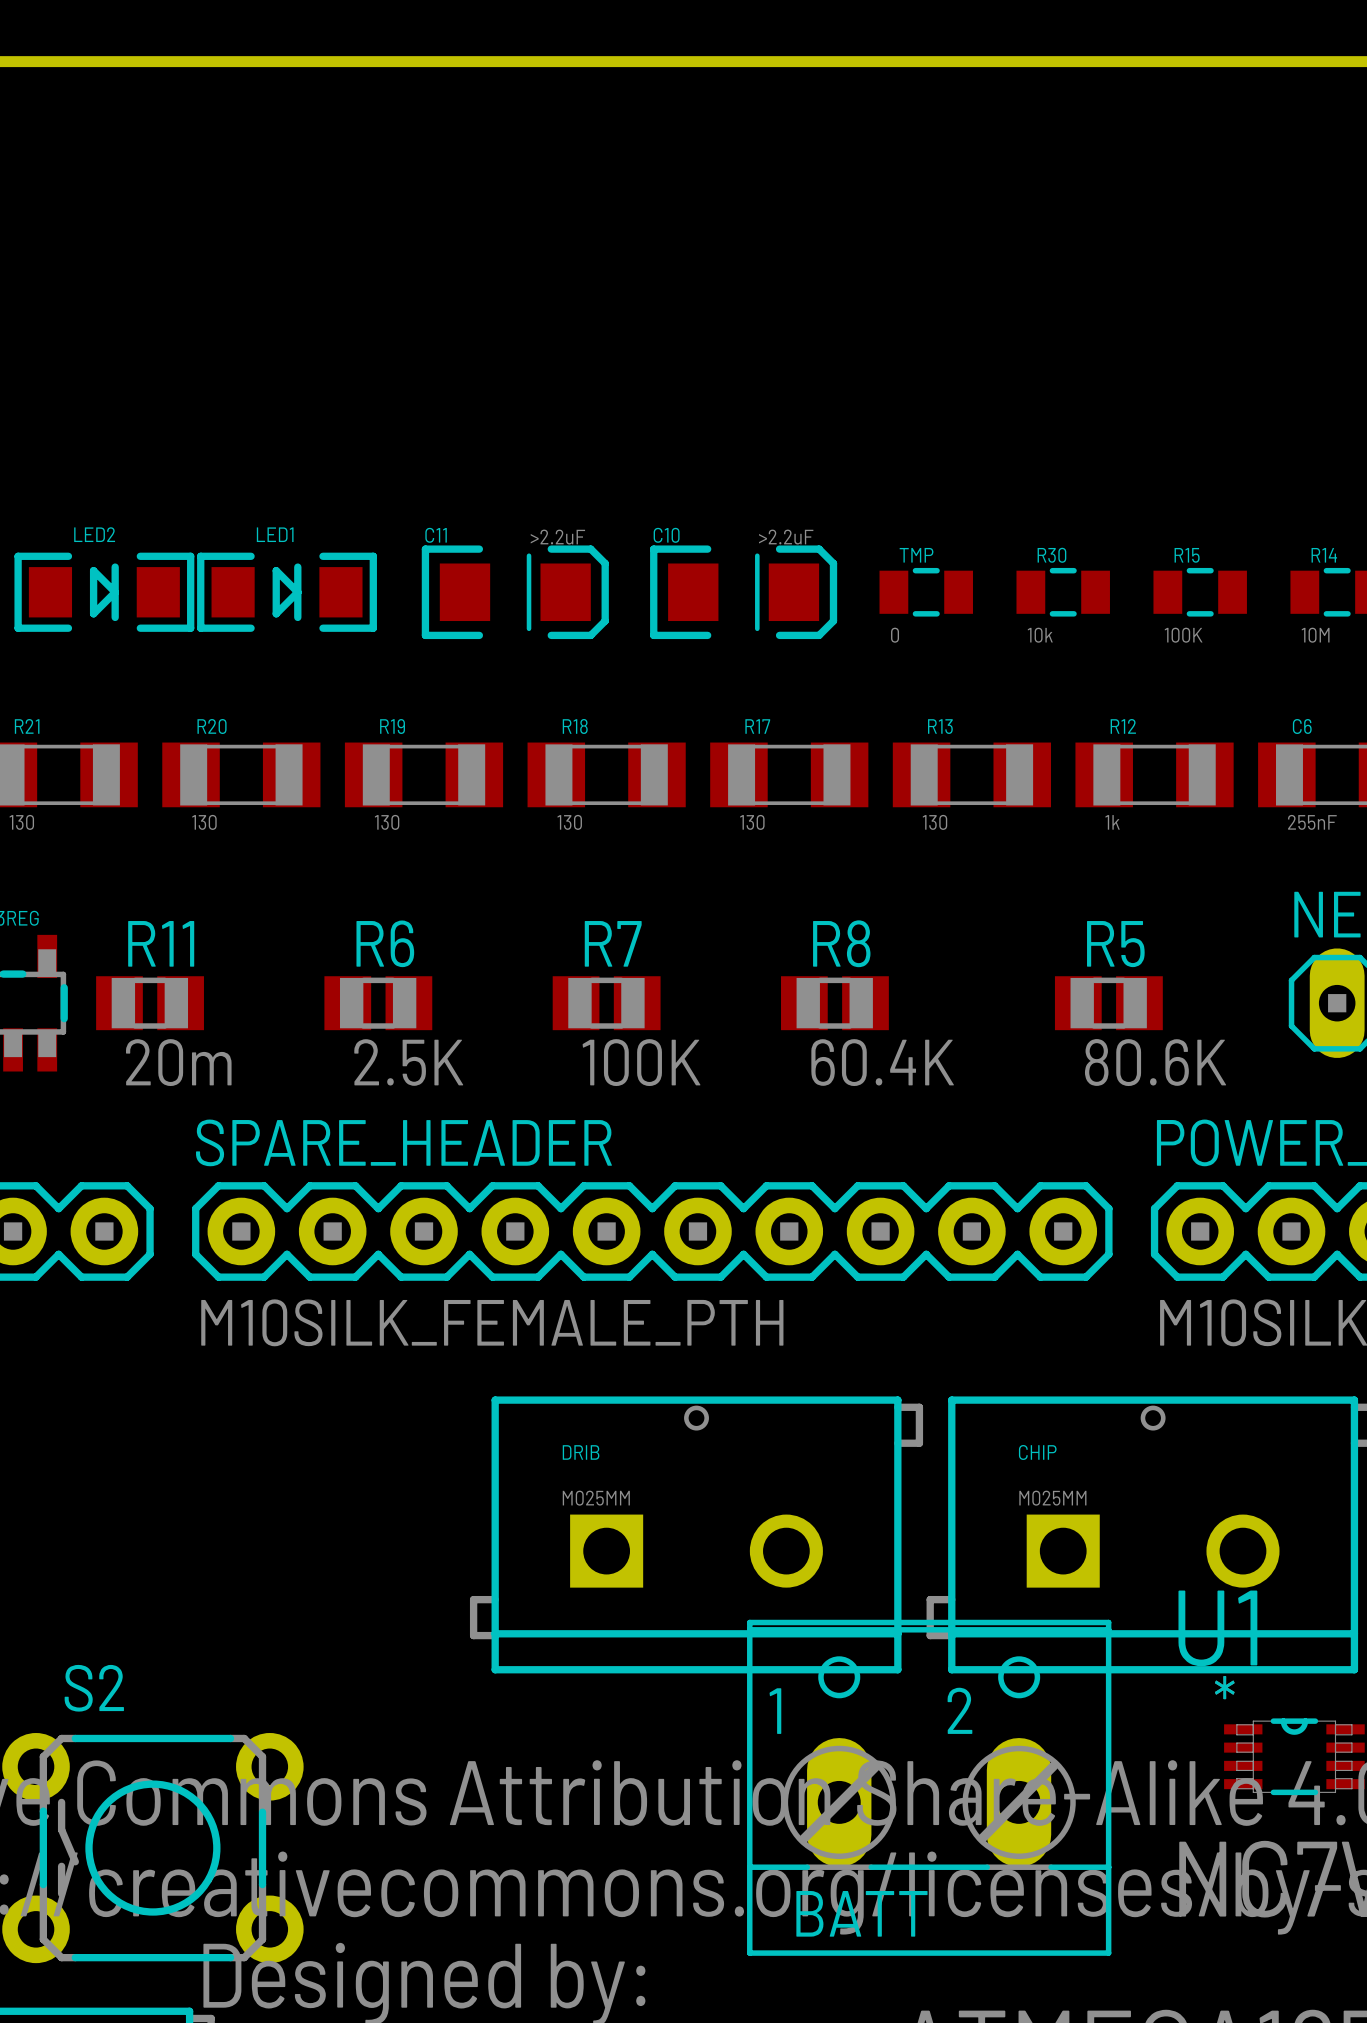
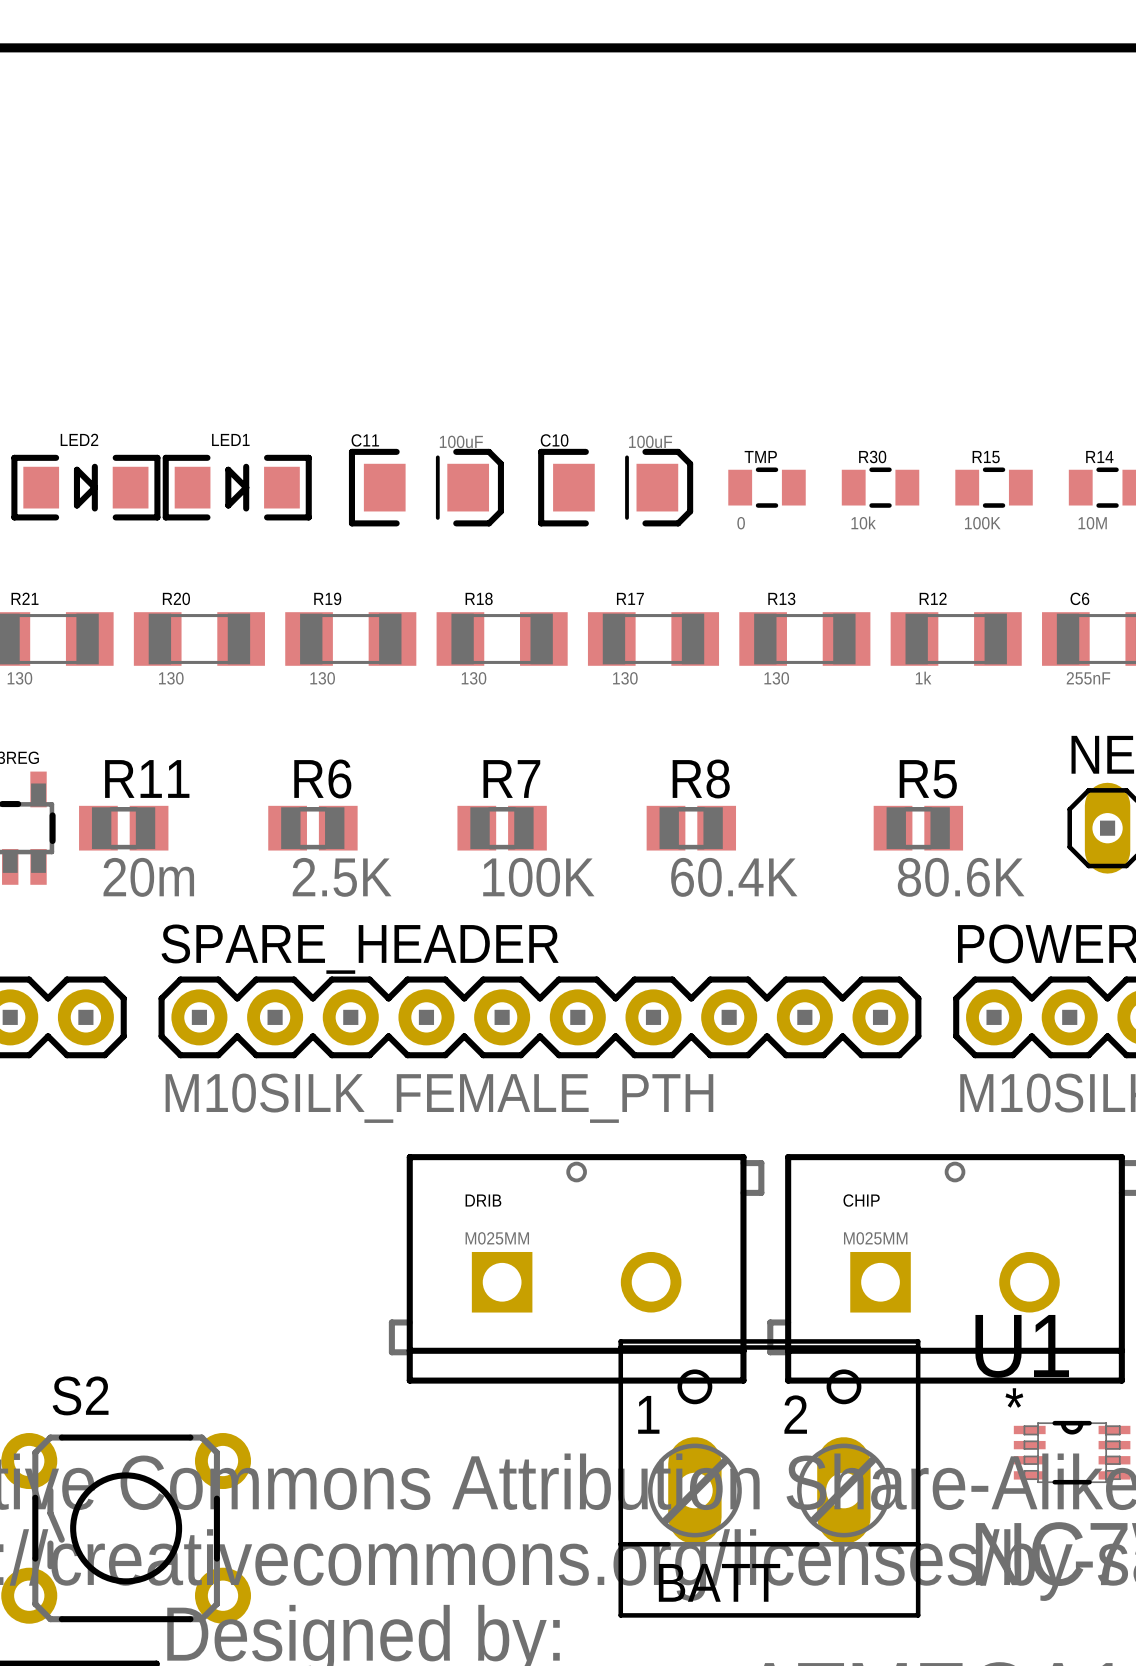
C11 value: >2.2uF (557, 537) -> 100uF (461, 441)
C10 value: >2.2uF (786, 537) -> 100uF (650, 441)

